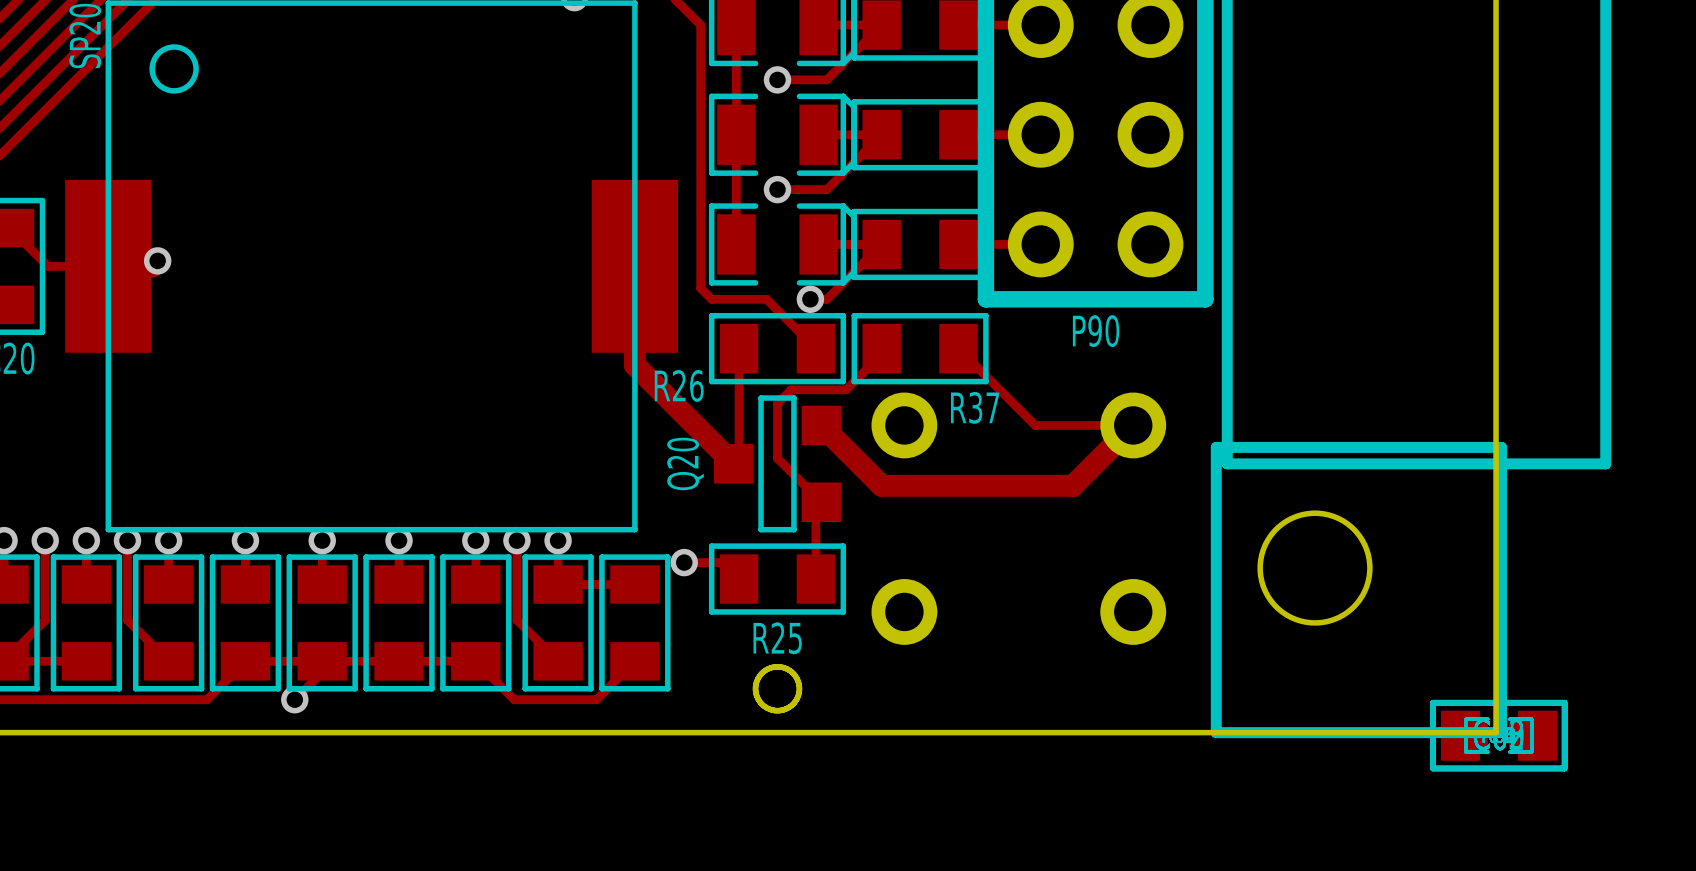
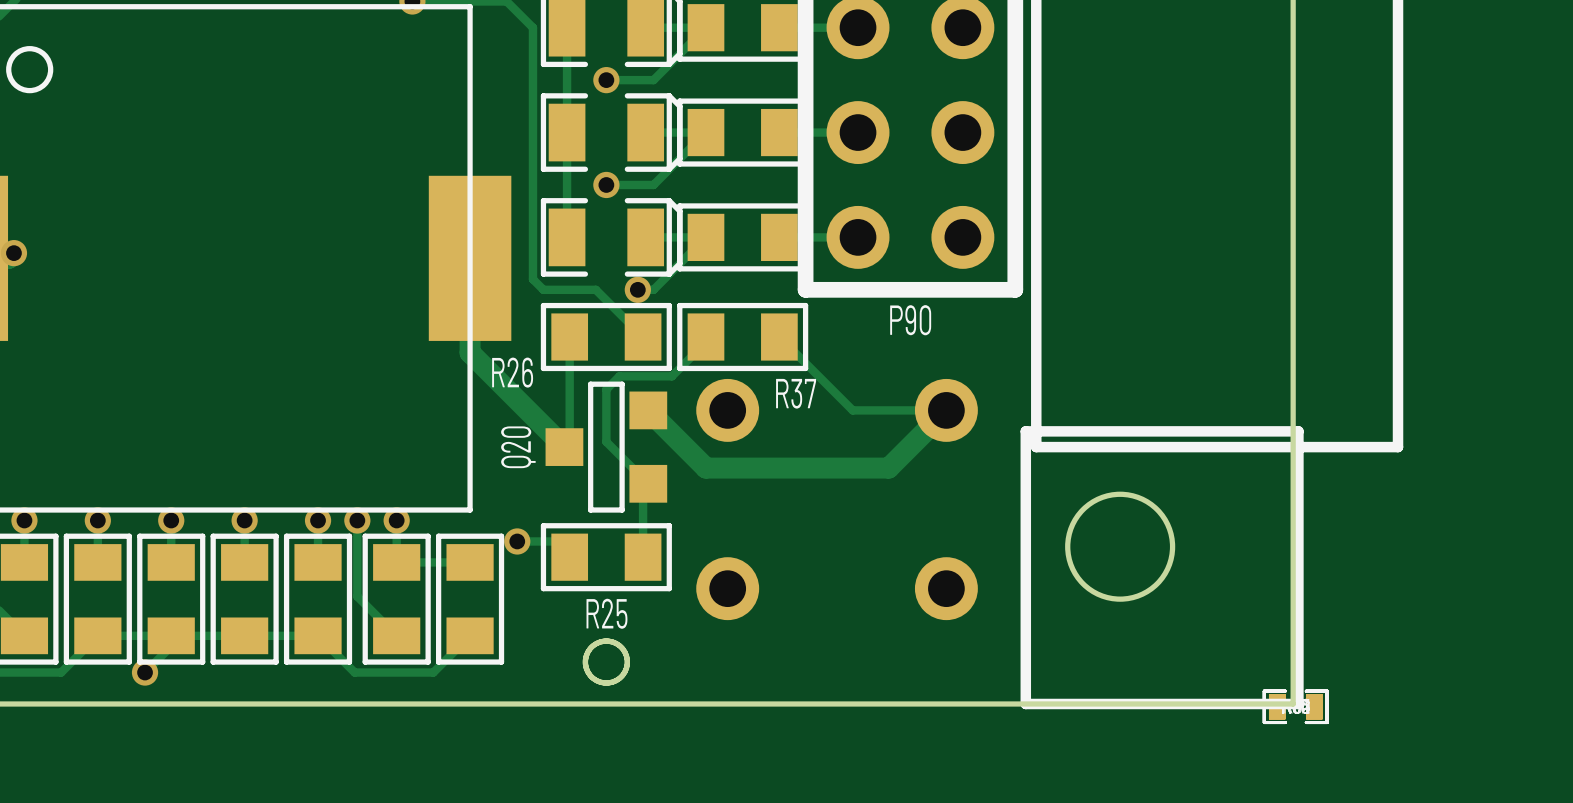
part: (1498, 735) -> none
part: (1498, 735) -> none
part: (1498, 735) -> none

